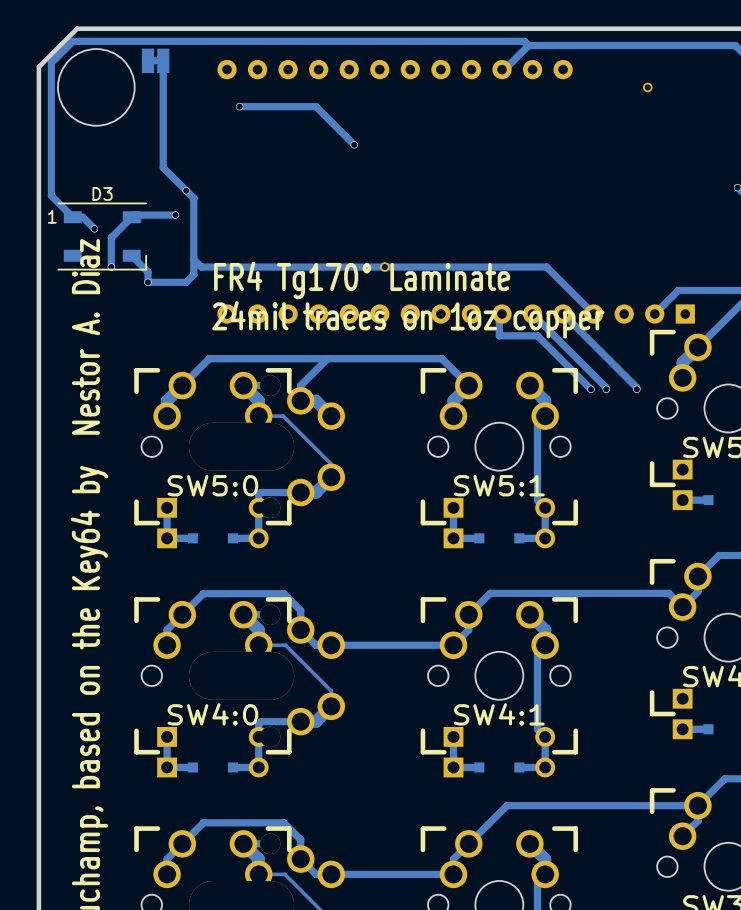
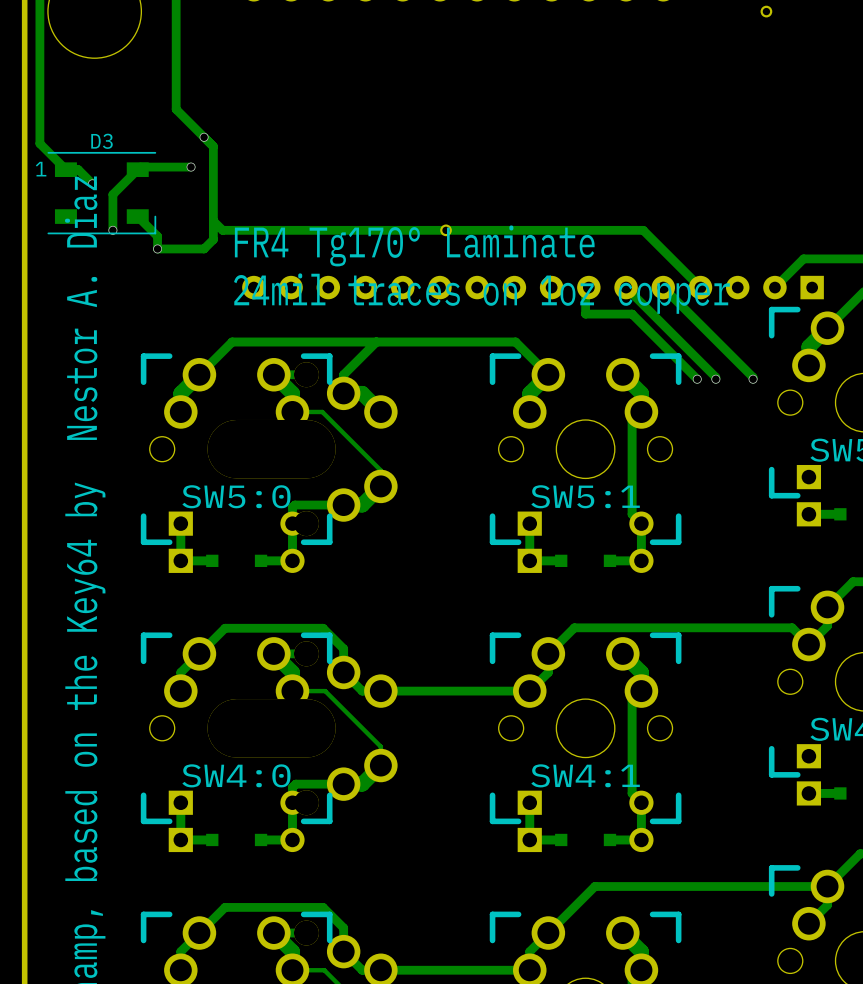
track: (239, 106) (316, 106) (354, 144) -> none
via: (239, 106) -> none
via: (354, 144) -> none

